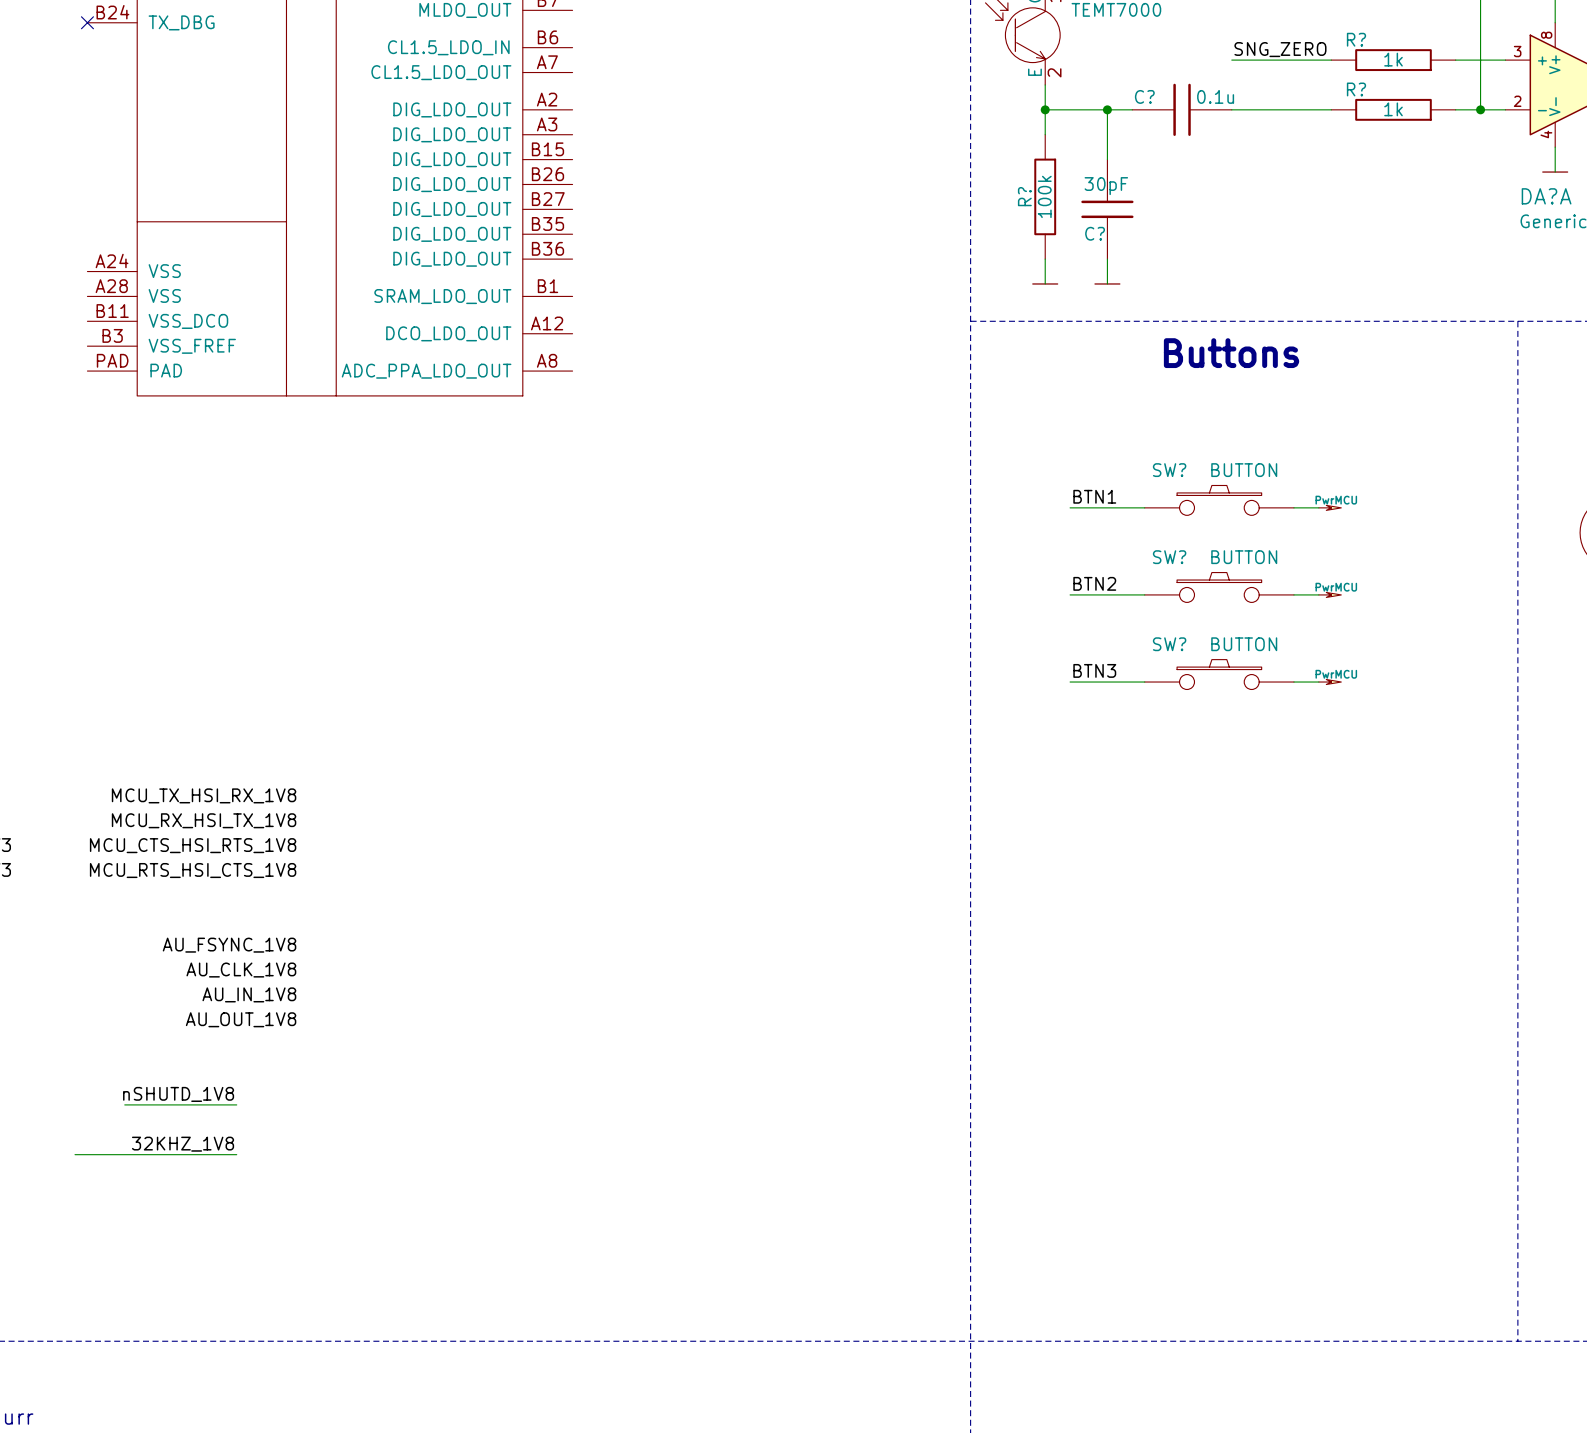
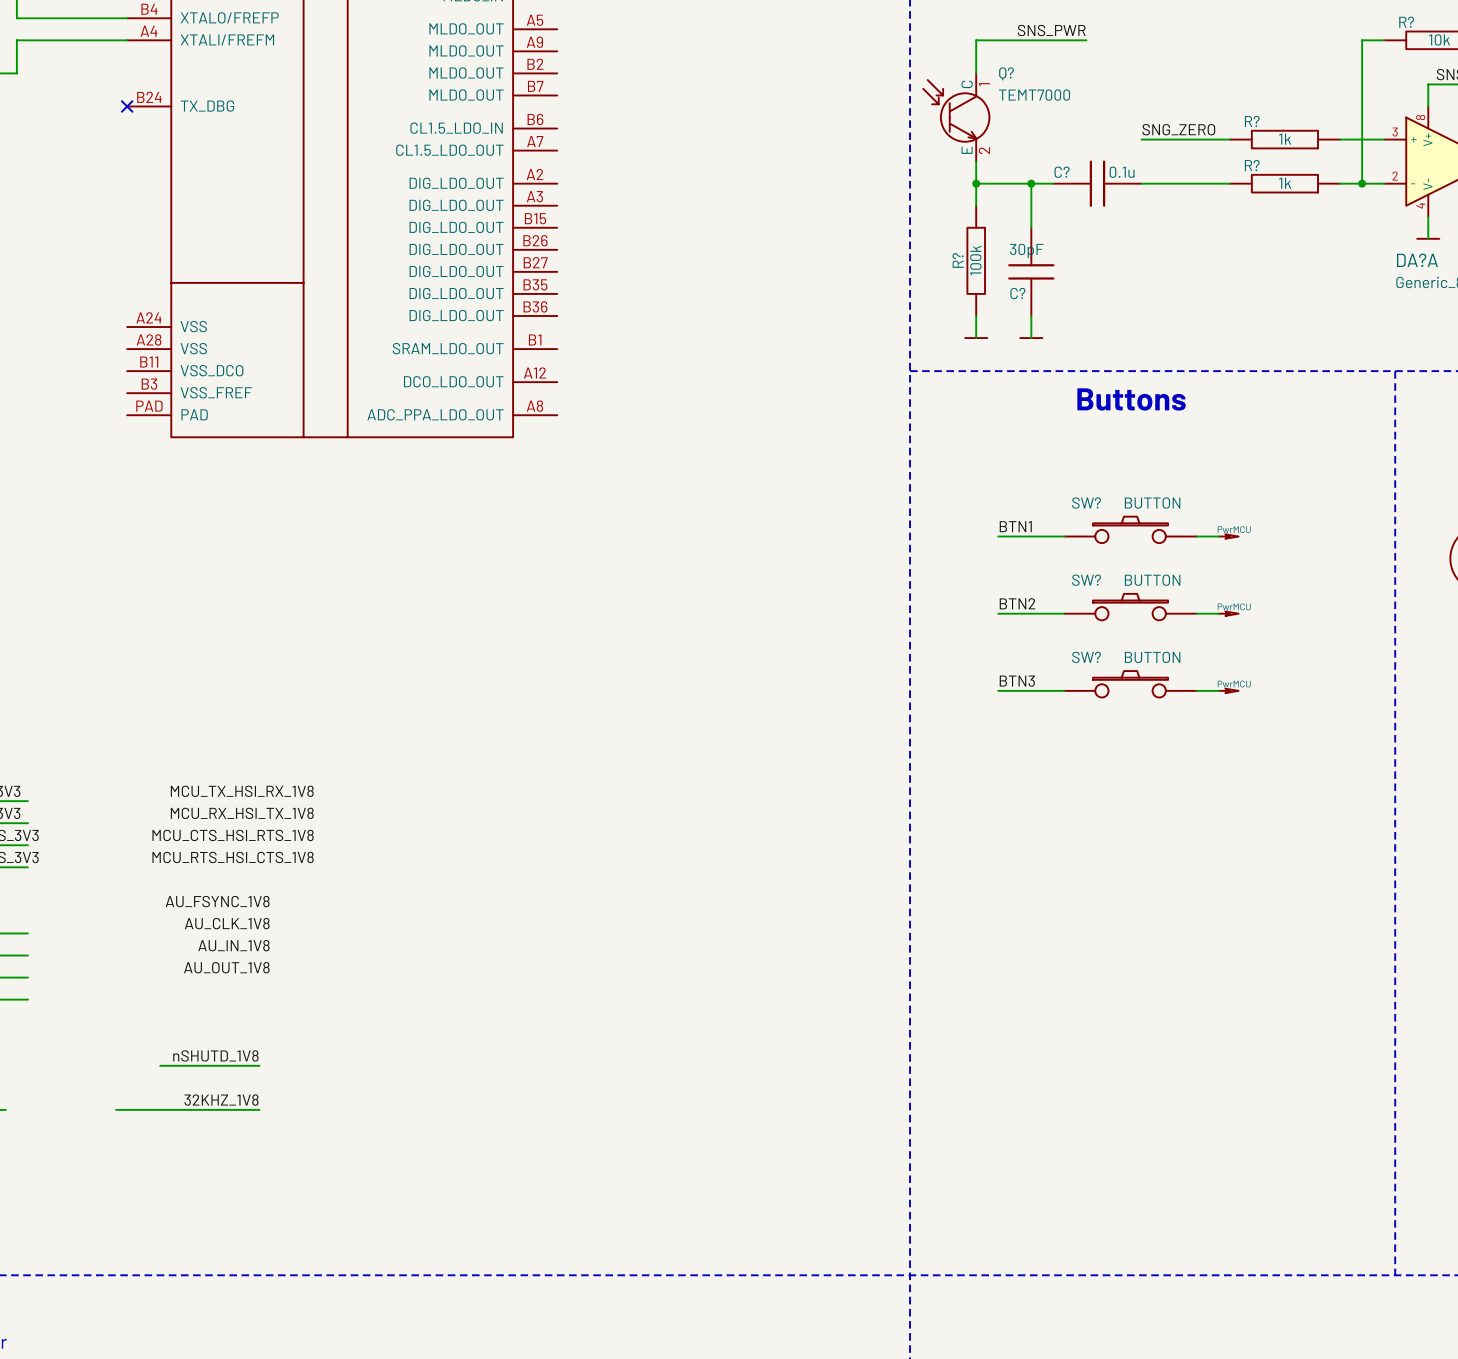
label position: AU_FSYNC_1V8 (229, 945) -> AU_FSYNC_1V8 (217, 901)
label position: AU_CLK_1V8 (241, 970) -> AU_CLK_1V8 (227, 923)
label position: AU_IN_1V8 (249, 994) -> AU_IN_1V8 (233, 945)
label position: AU_OUT_1V8 (241, 1019) -> AU_OUT_1V8 (226, 967)

